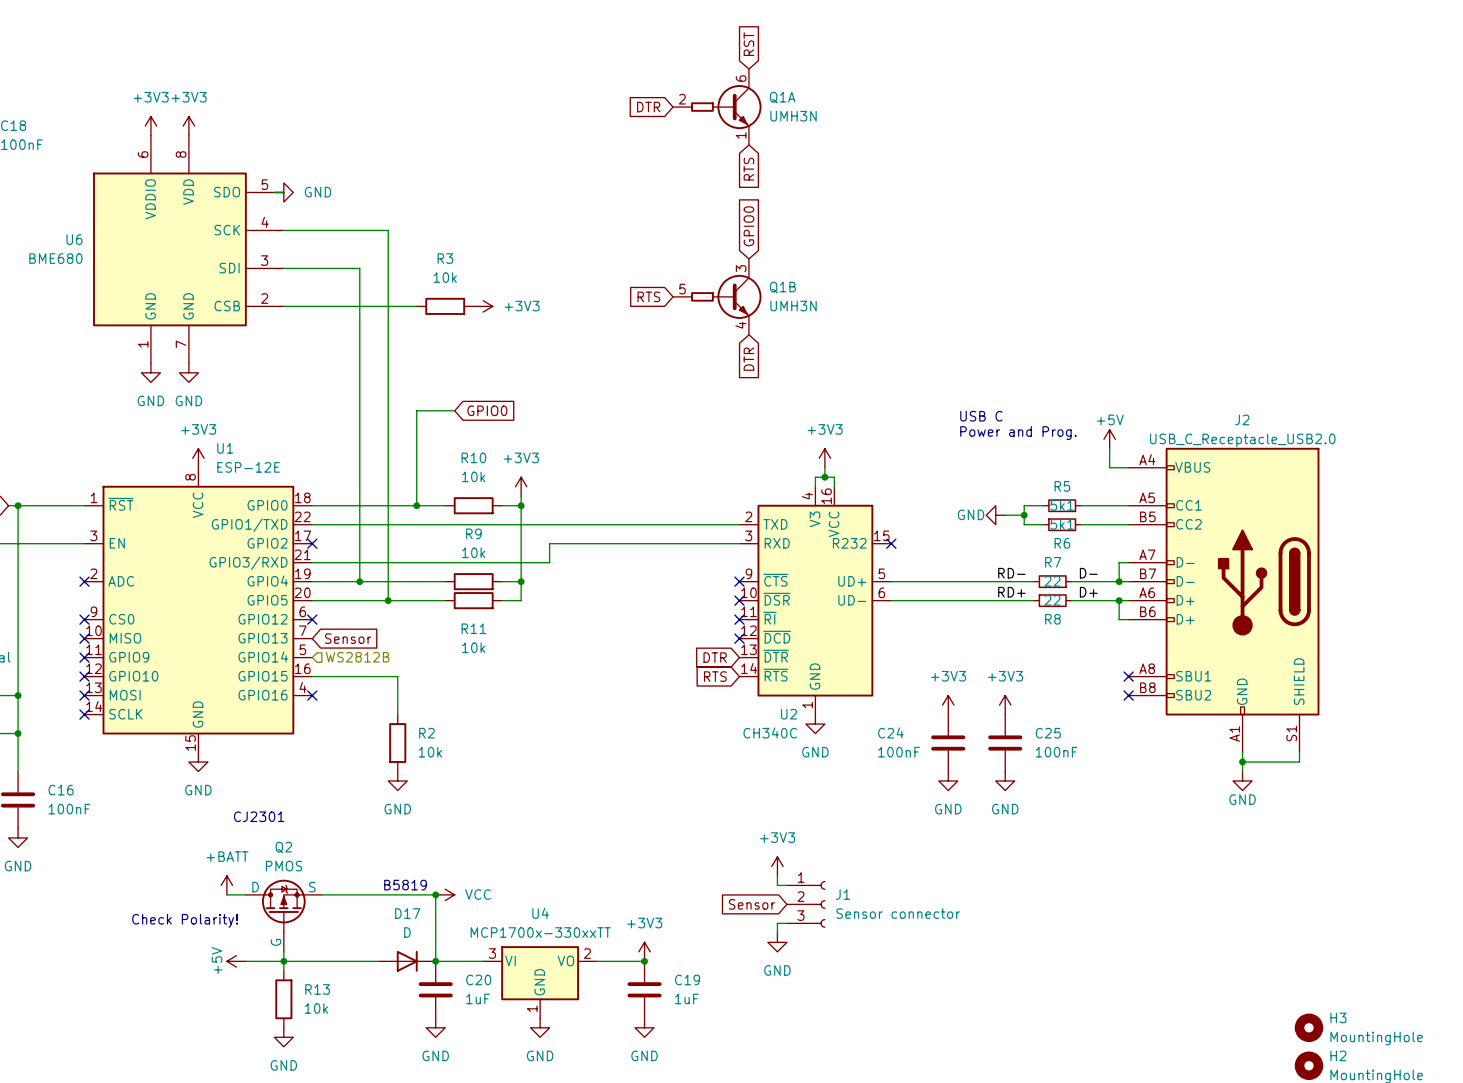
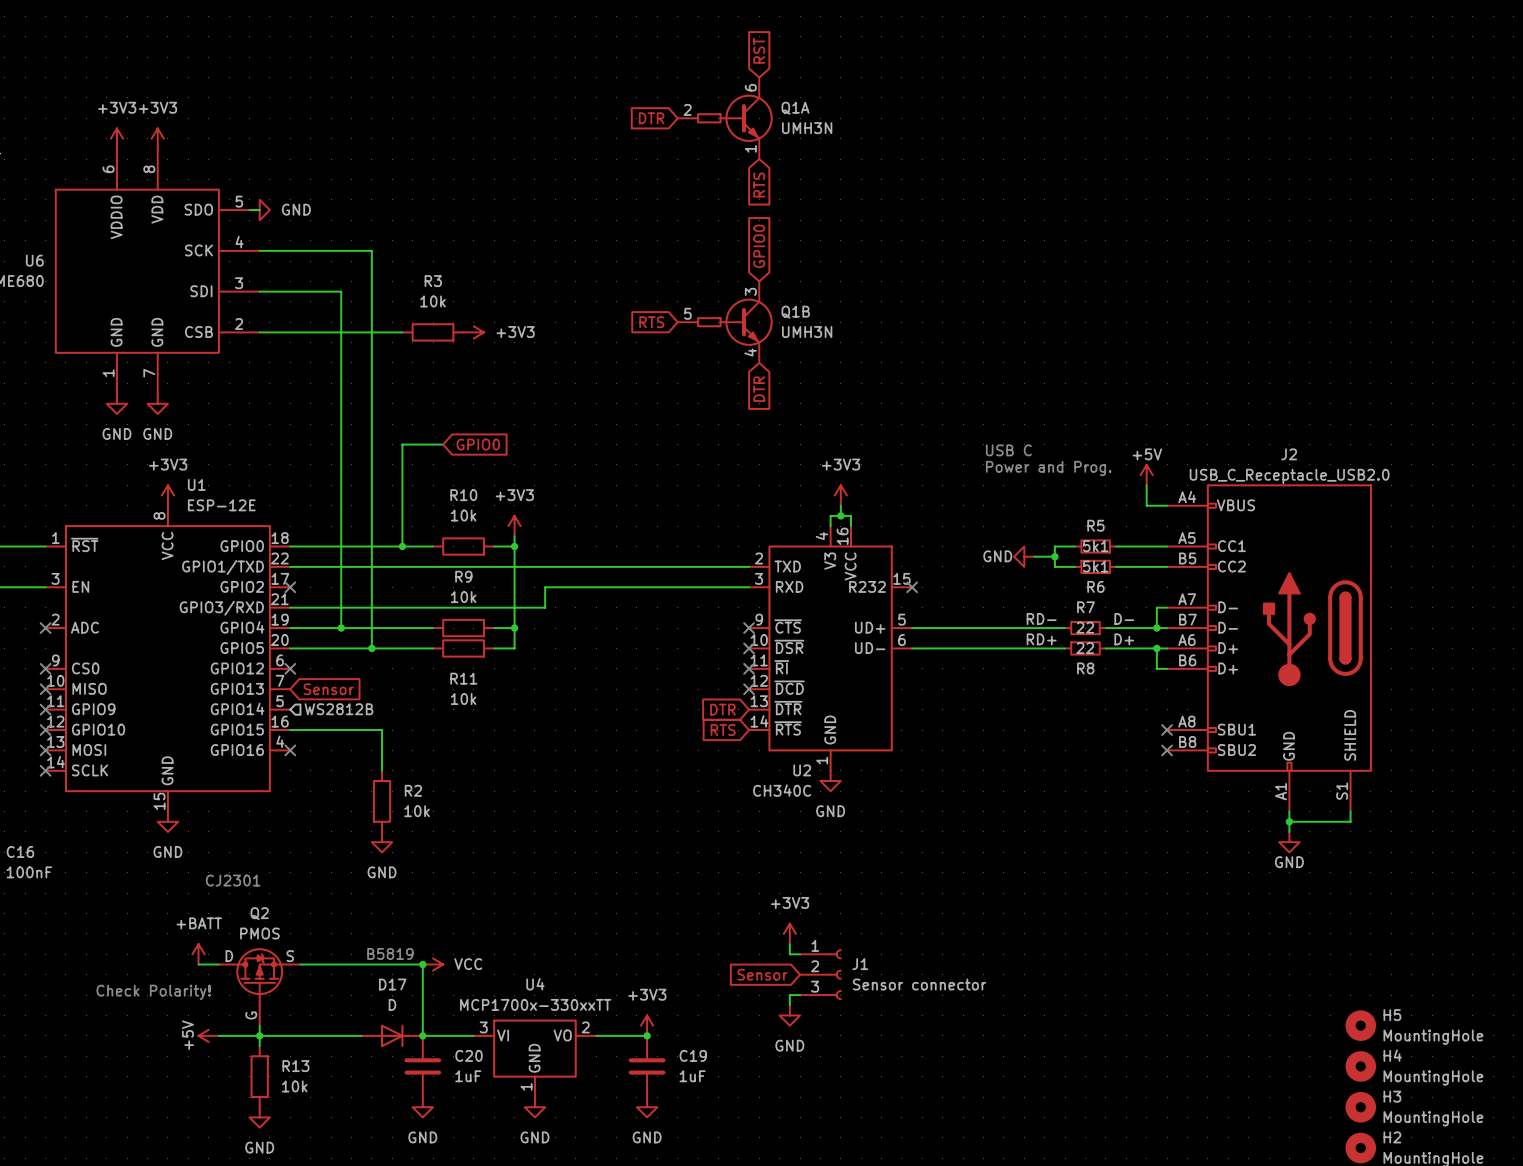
power symbol: +3V3 (948, 705) -> none
power symbol: +3V3 (1005, 705) -> none
C24: 100nF (948, 743) -> none
C25: 100nF (1005, 743) -> none
power symbol: GND (948, 780) -> none
power symbol: GND (1005, 780) -> none
H5: none -> MountingHole (1360, 1025)
H4: none -> MountingHole (1360, 1066)

